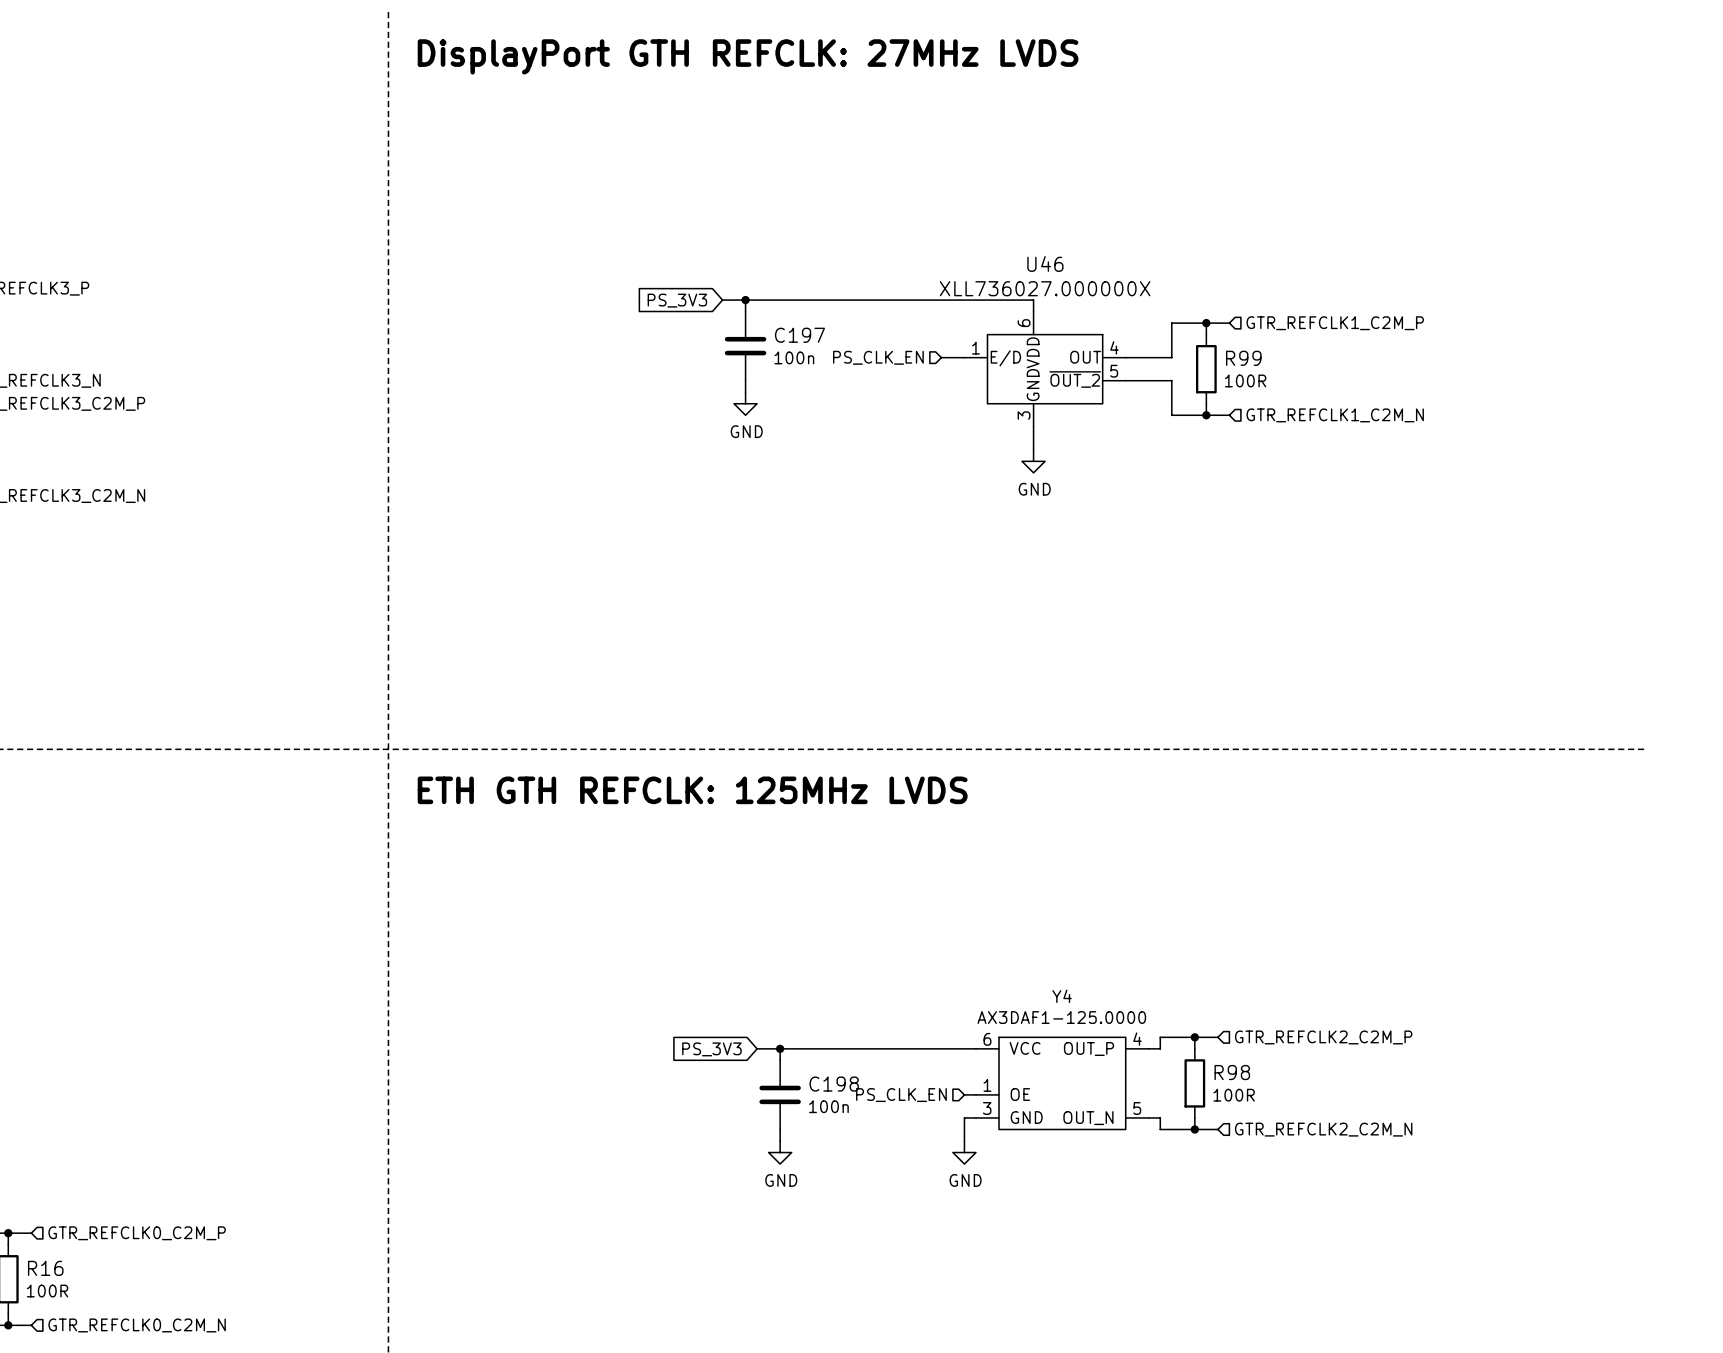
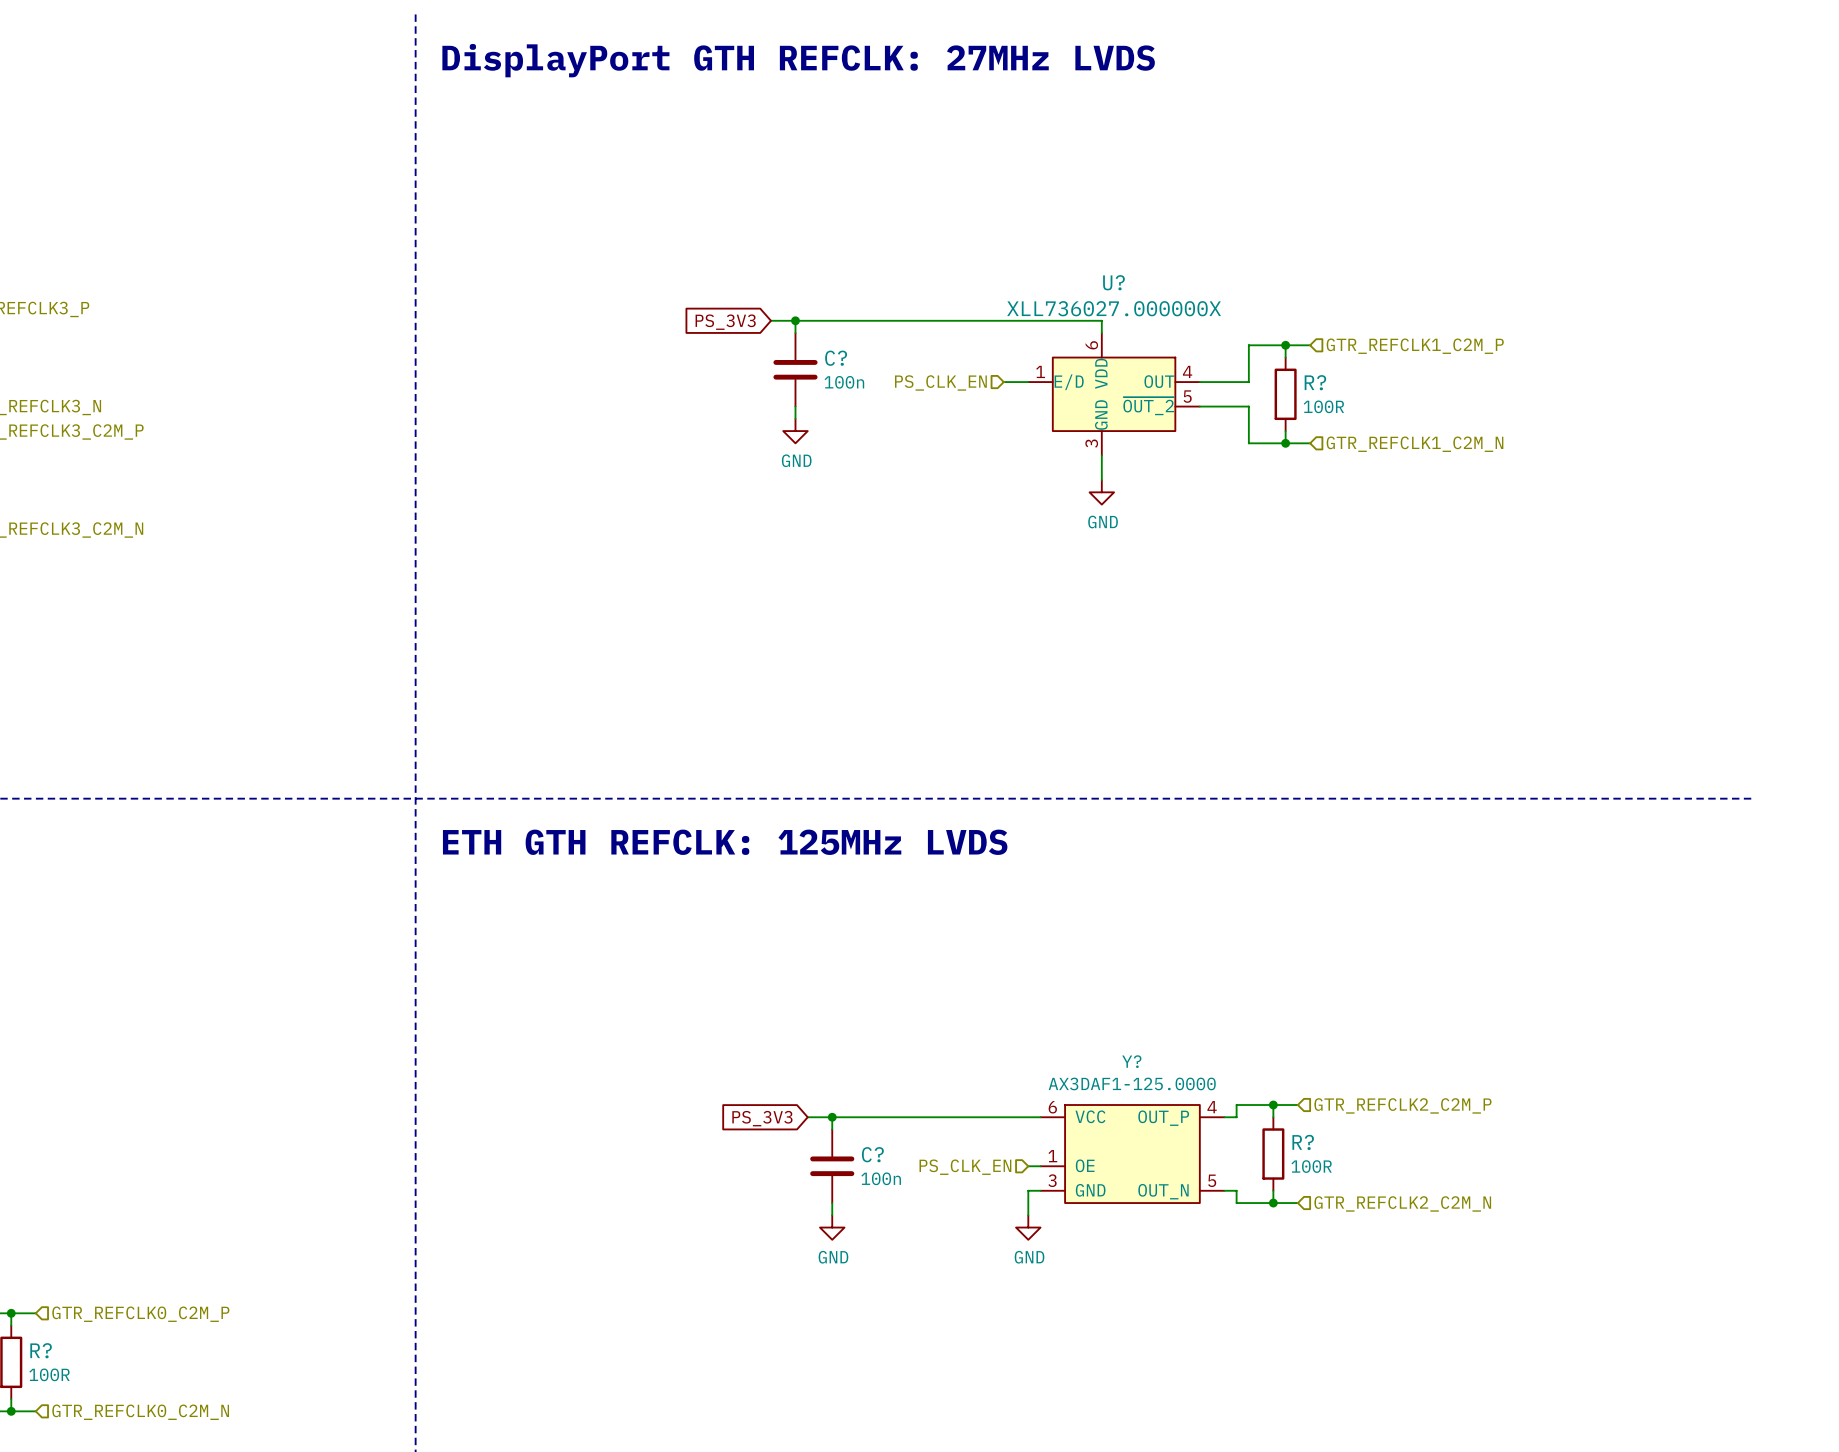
U46 name: U46 (1045, 263) -> U? (1113, 282)
C197 name: C197 (799, 335) -> C? (836, 358)
R99 name: R99 (1243, 358) -> R? (1315, 382)
Y4 name: Y4 (1062, 996) -> Y? (1131, 1061)
R98 name: R98 (1232, 1072) -> R? (1303, 1142)
C198 name: C198 (834, 1084) -> C? (872, 1154)
R16 name: R16 (45, 1268) -> R? (41, 1350)

